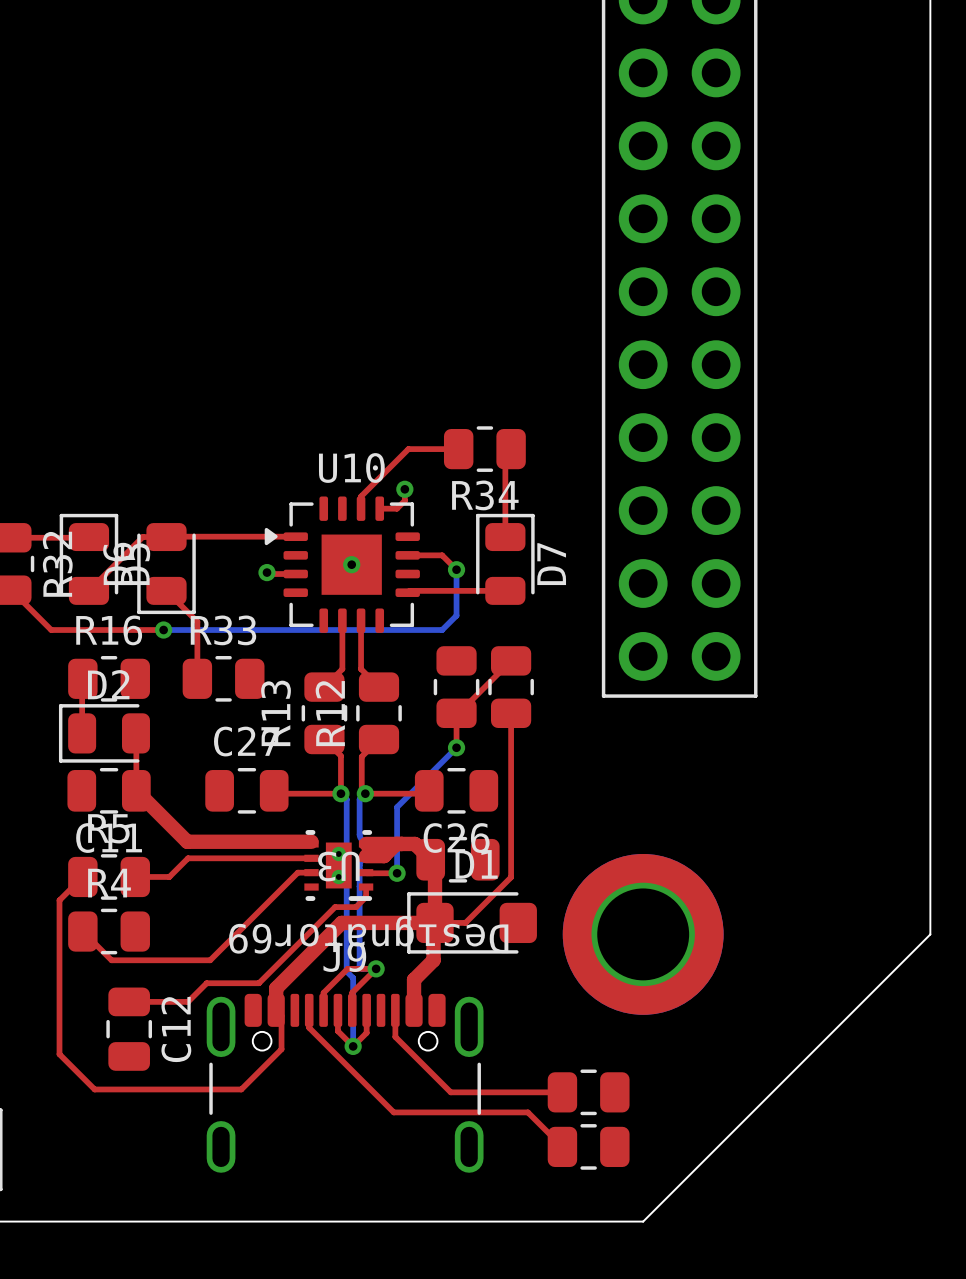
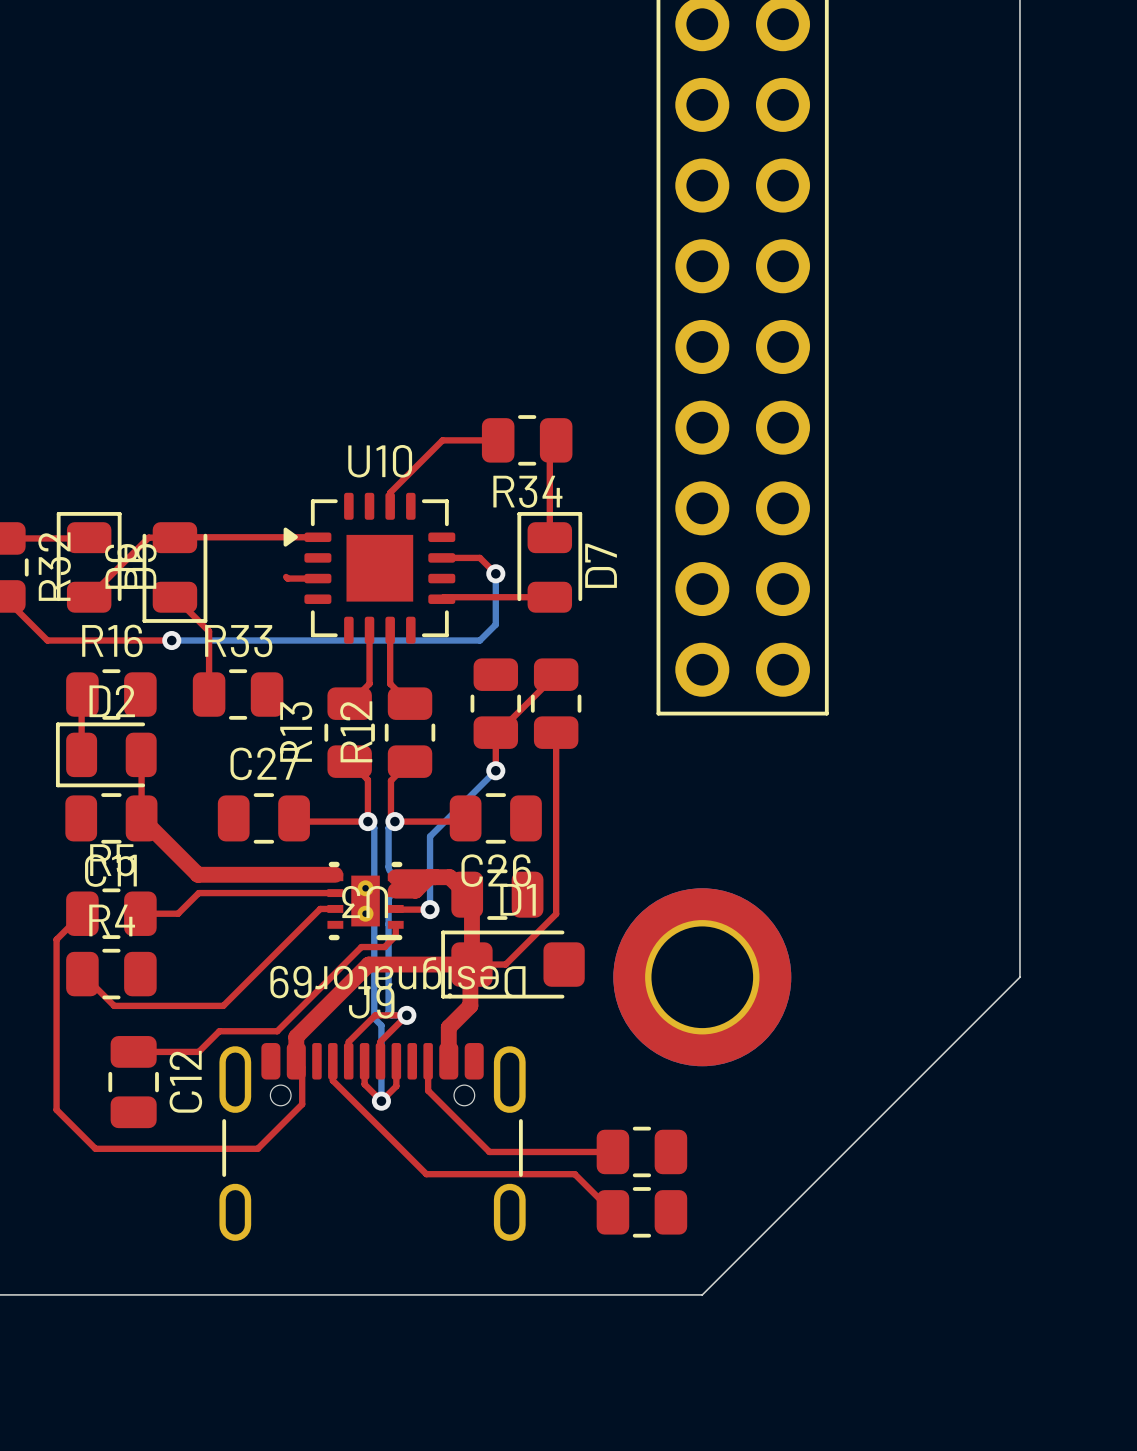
top track: (404, 489) (404, 500) (396, 508) (379, 508) -> none
via: (404, 489) -> none
via: (351, 564) -> none
via: (267, 572) -> none

